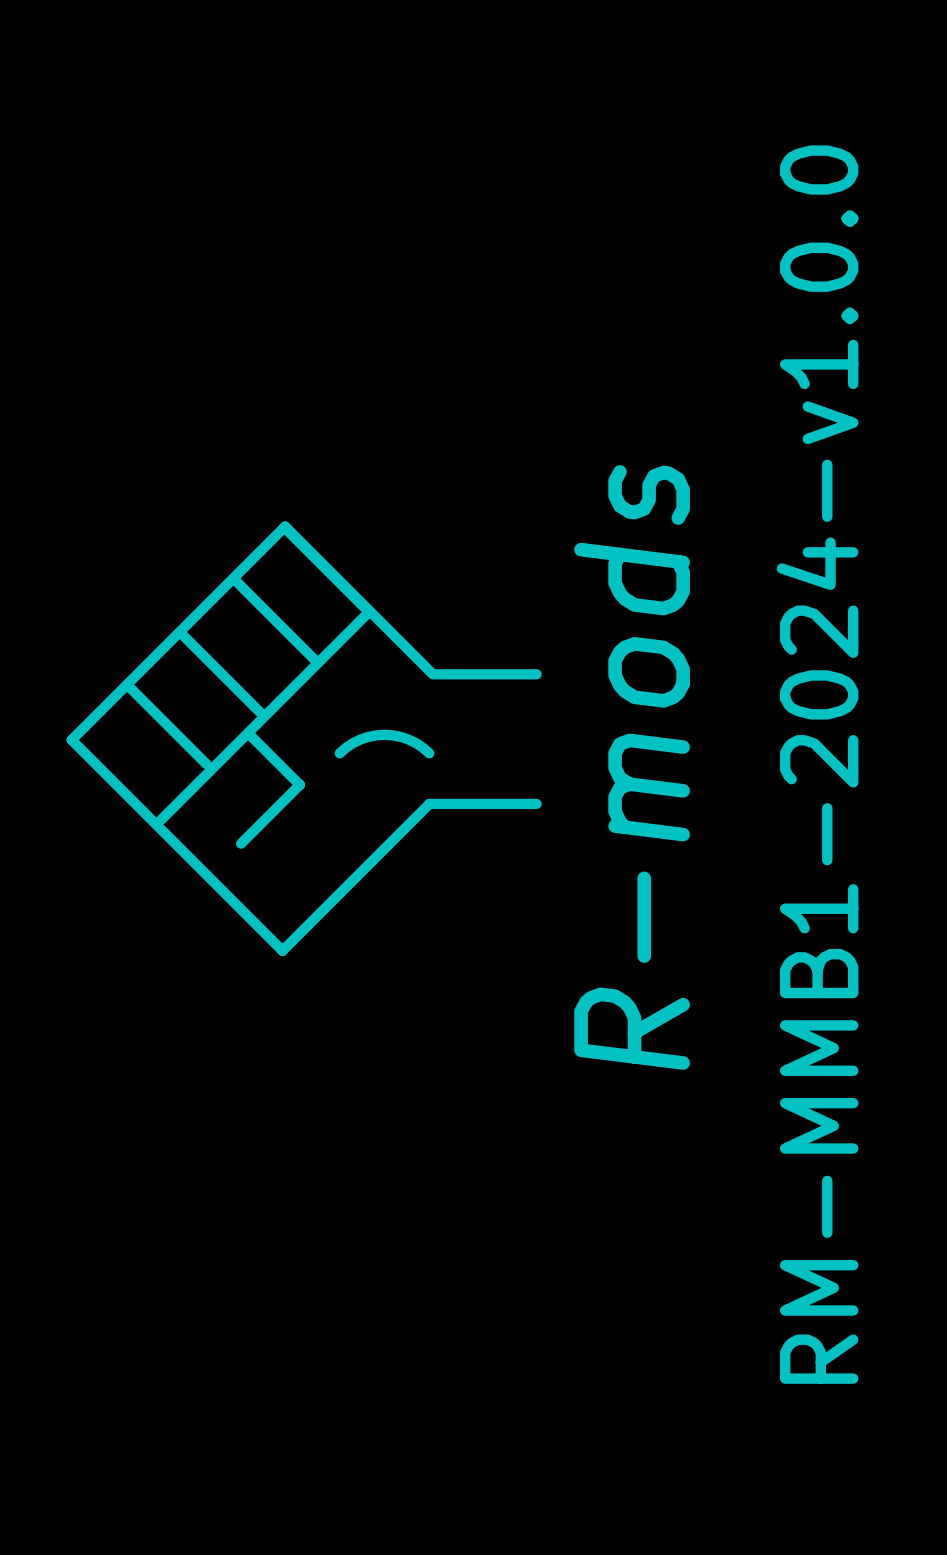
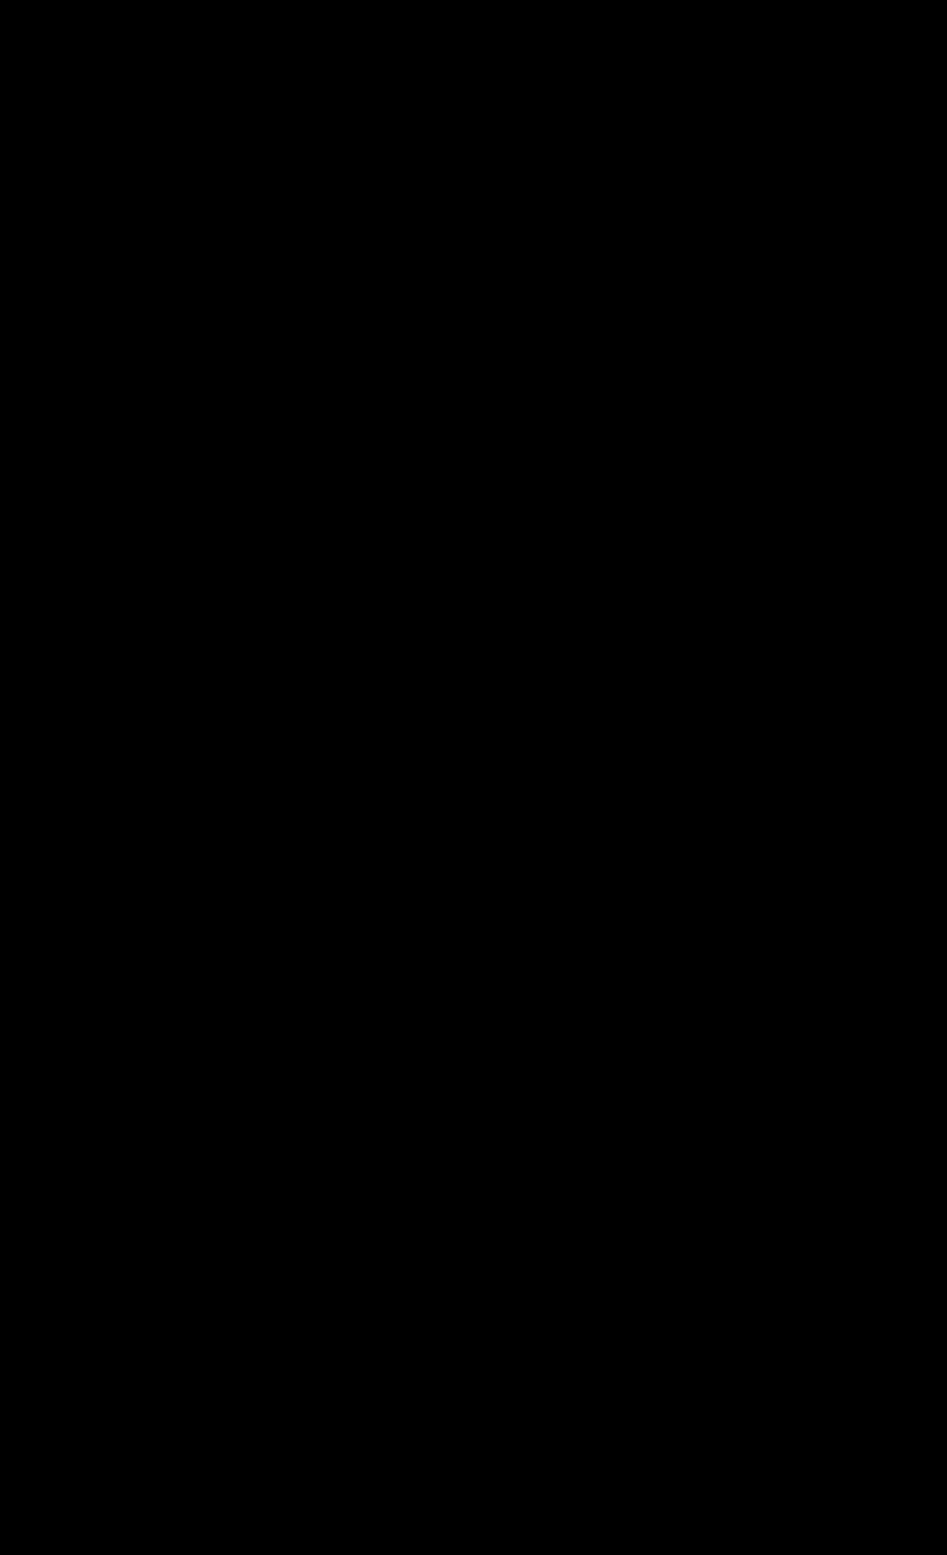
line: (284, 527) (368, 612) (161, 819) -> none
line: (234, 579) (317, 662) -> none
line: (182, 634) (261, 714) -> none
line: (431, 672) (285, 526) (71, 739) (282, 950) (429, 803) (536, 803) -> none
line: (536, 674) (432, 674) -> none
line: (127, 685) (206, 764) -> none
line: (249, 734) (299, 784) (241, 843) -> none
line: (429, 753) (408, 739) (384, 734) (360, 739) (339, 753) -> none
text: RM-MMB1-2024-v1.0.0 (817, 764) -> none
text: R-mods (632, 767) -> none

